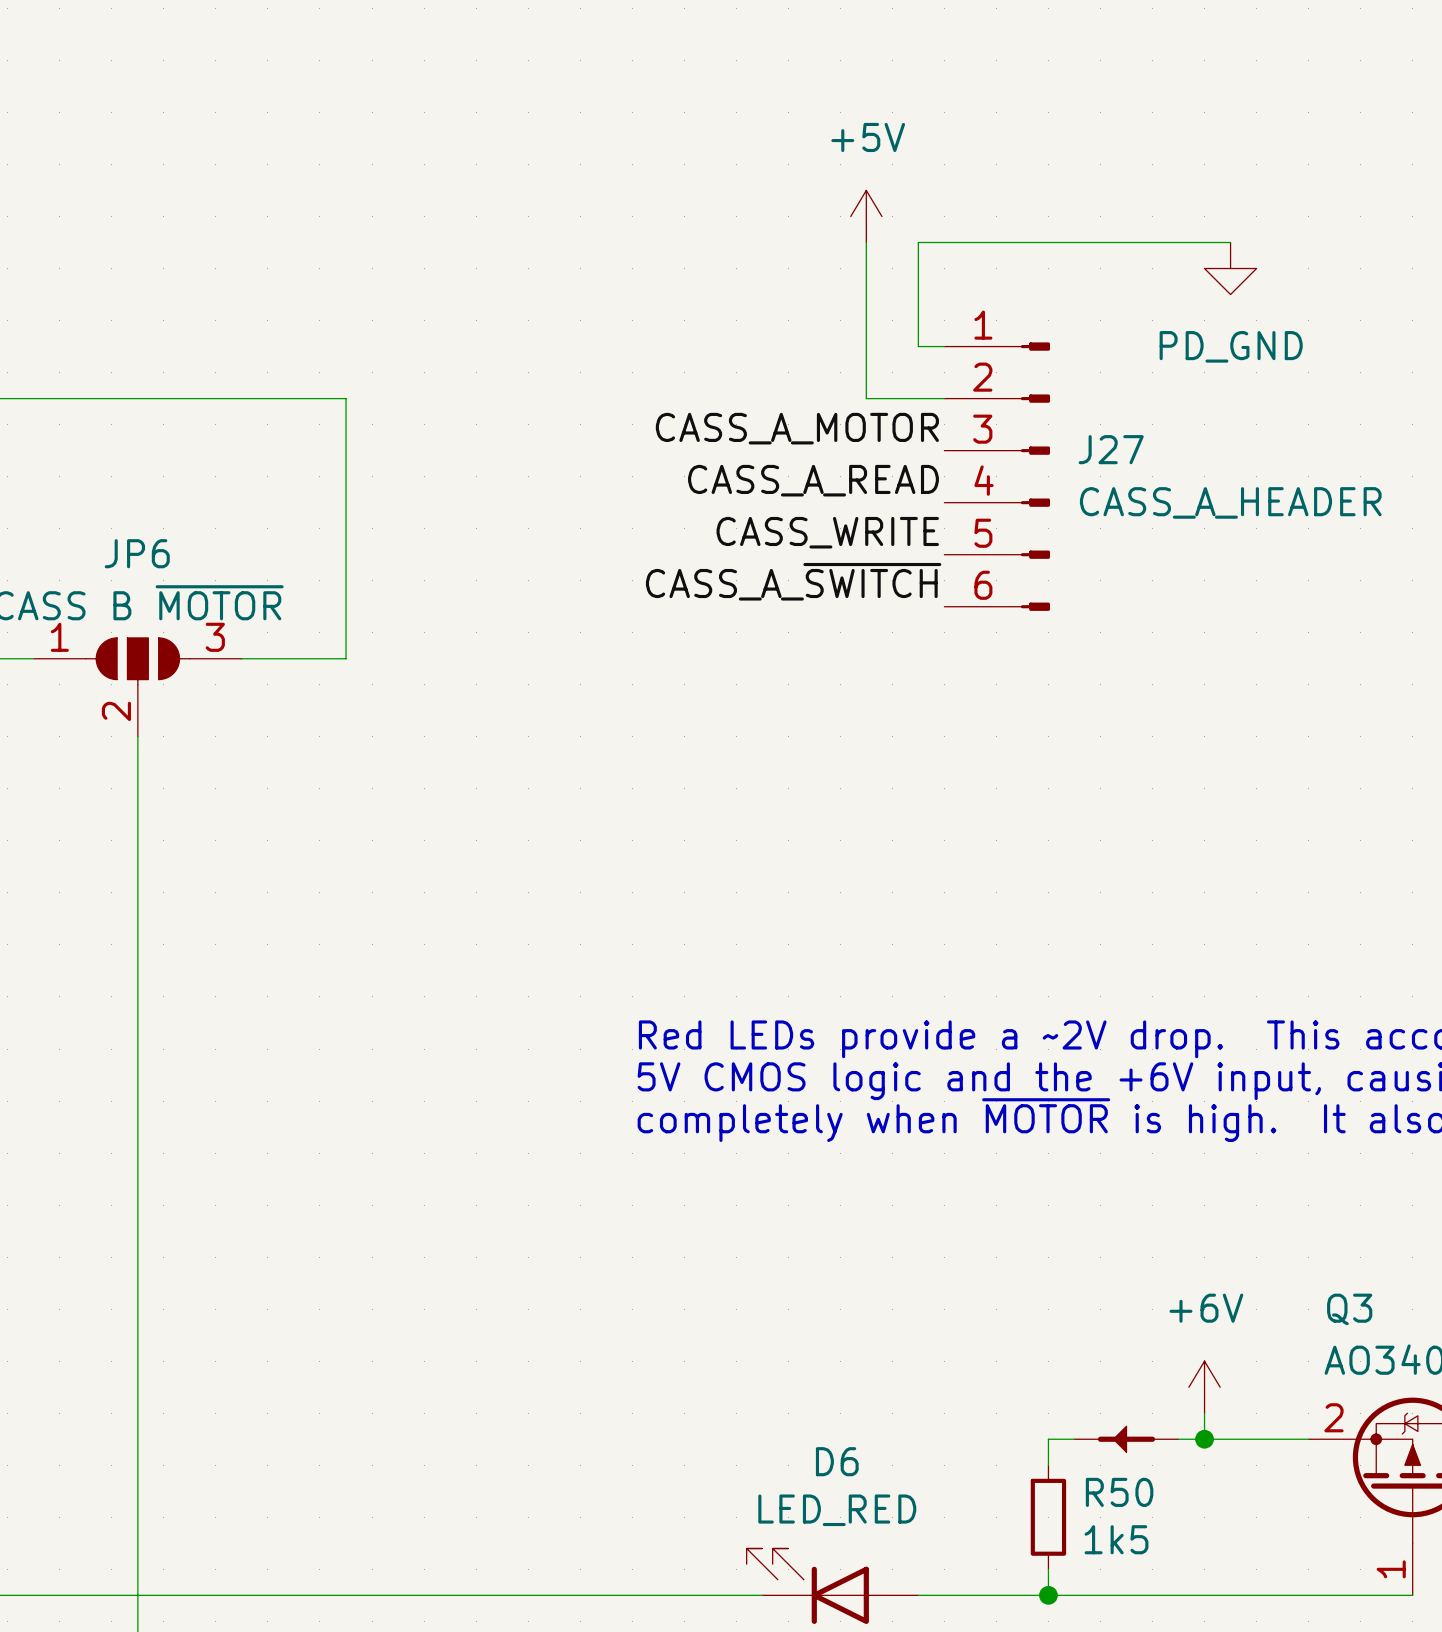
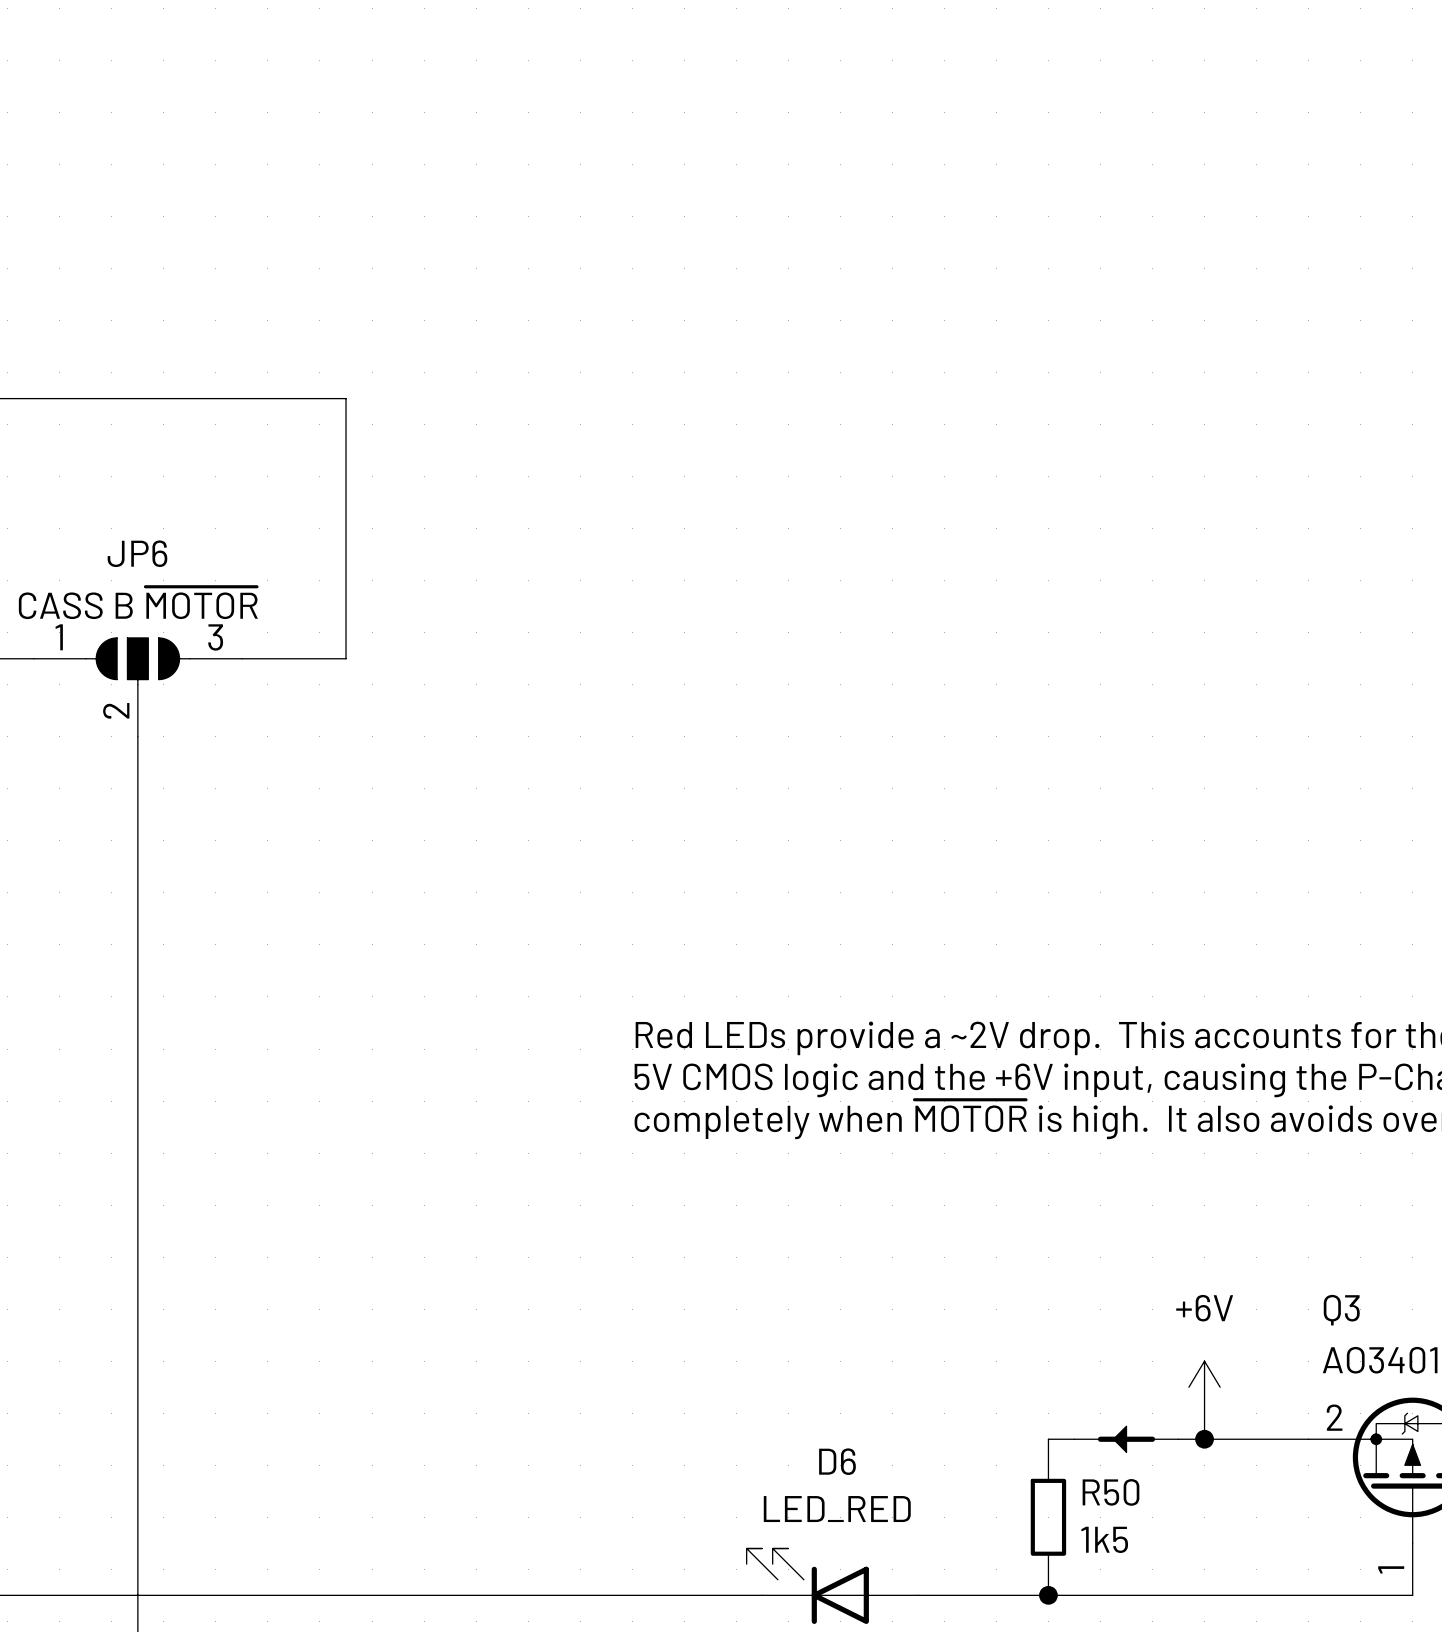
power symbol: +5V (866, 216) -> none
wire: (866, 242) (866, 398) (944, 398) -> none
wire: (1230, 242) (918, 242) (918, 346) (944, 346) -> none
power symbol: PD_GND (1230, 268) -> none
label: CASS_A_MOTOR (797, 428) -> none
J27: CASS_A_HEADER (997, 476) -> none
label: CASS_A_READ (813, 480) -> none
label: CASS_WRITE (827, 532) -> none
label: CASS_A_~{SWITCH} (793, 581) -> none

